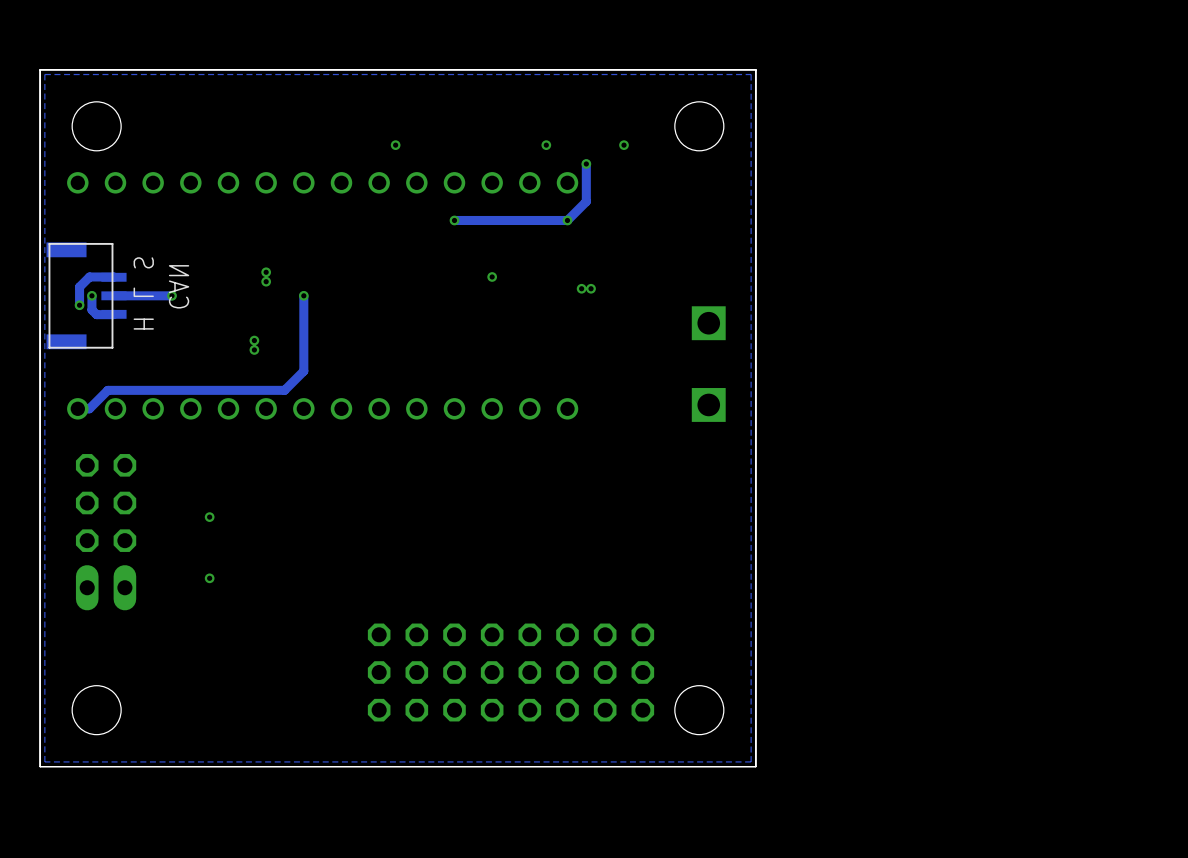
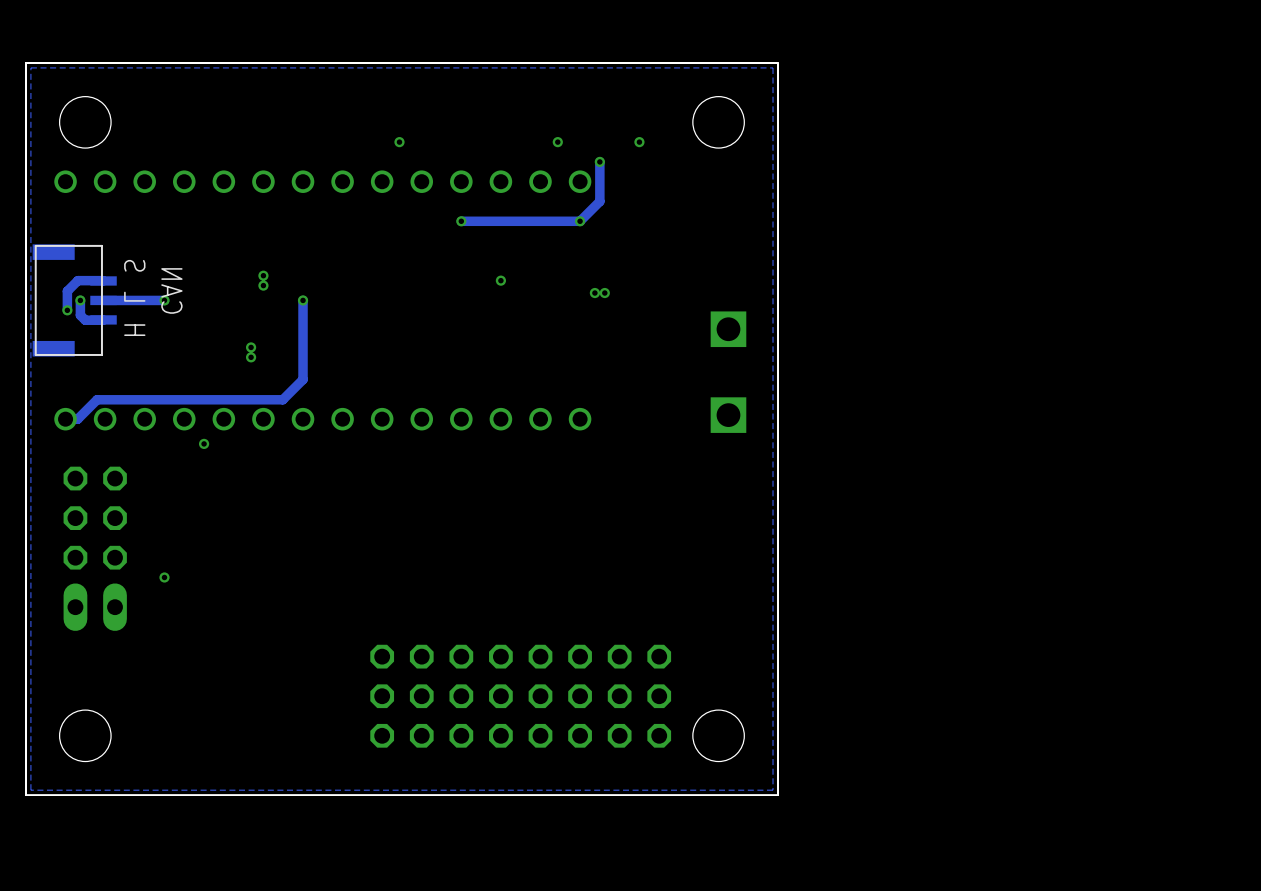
via: none -> (204, 443)
via: (209, 517) -> none
via: none -> (164, 577)
via: (209, 578) -> none

